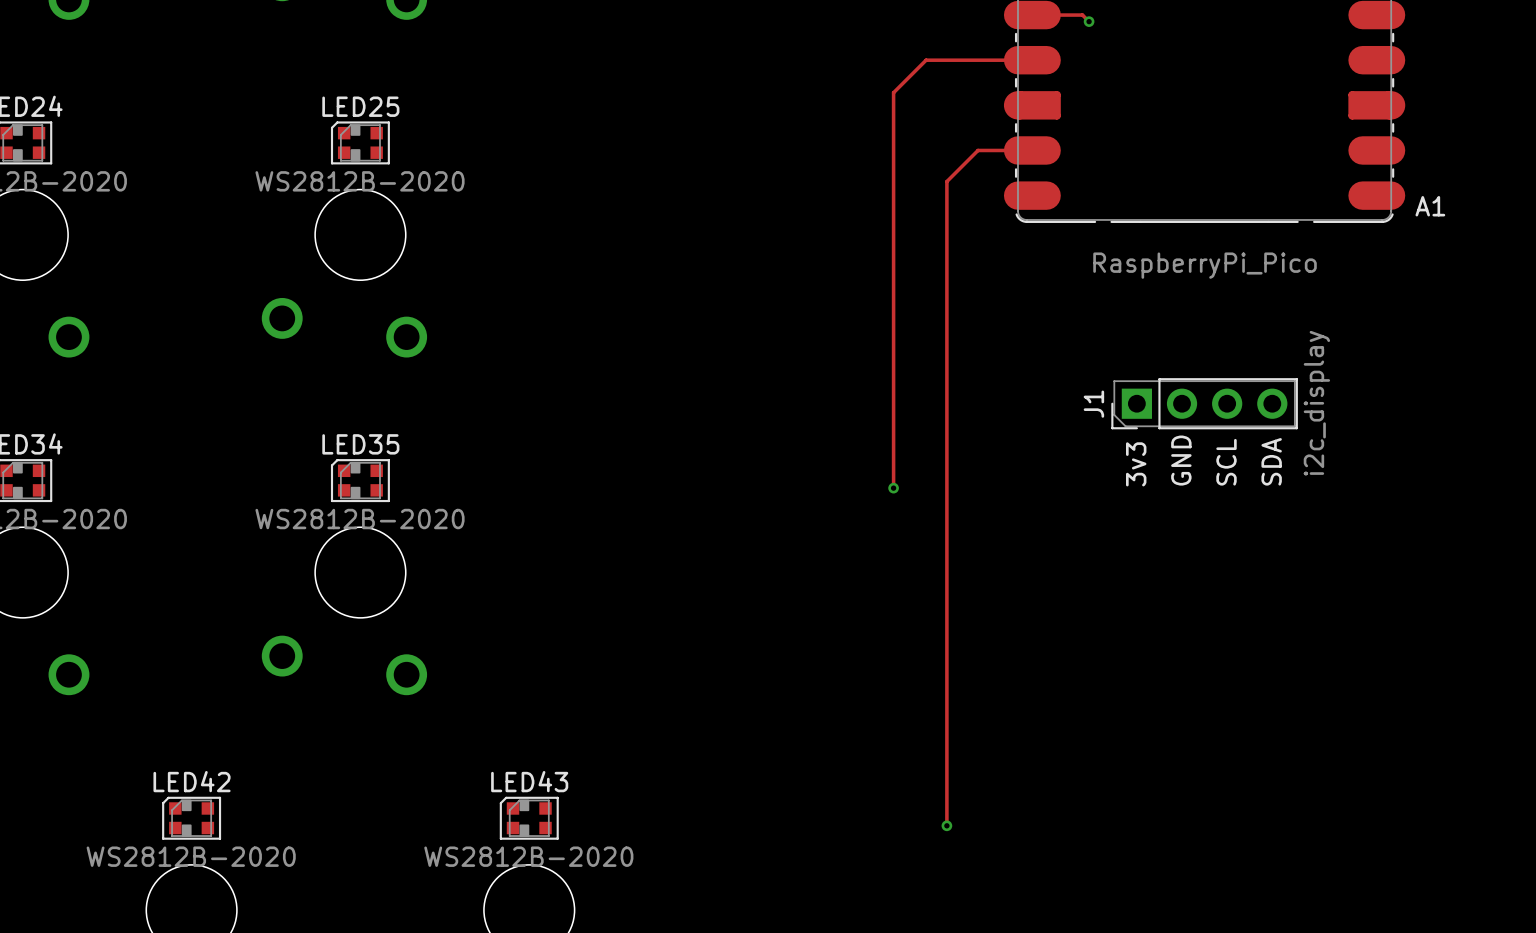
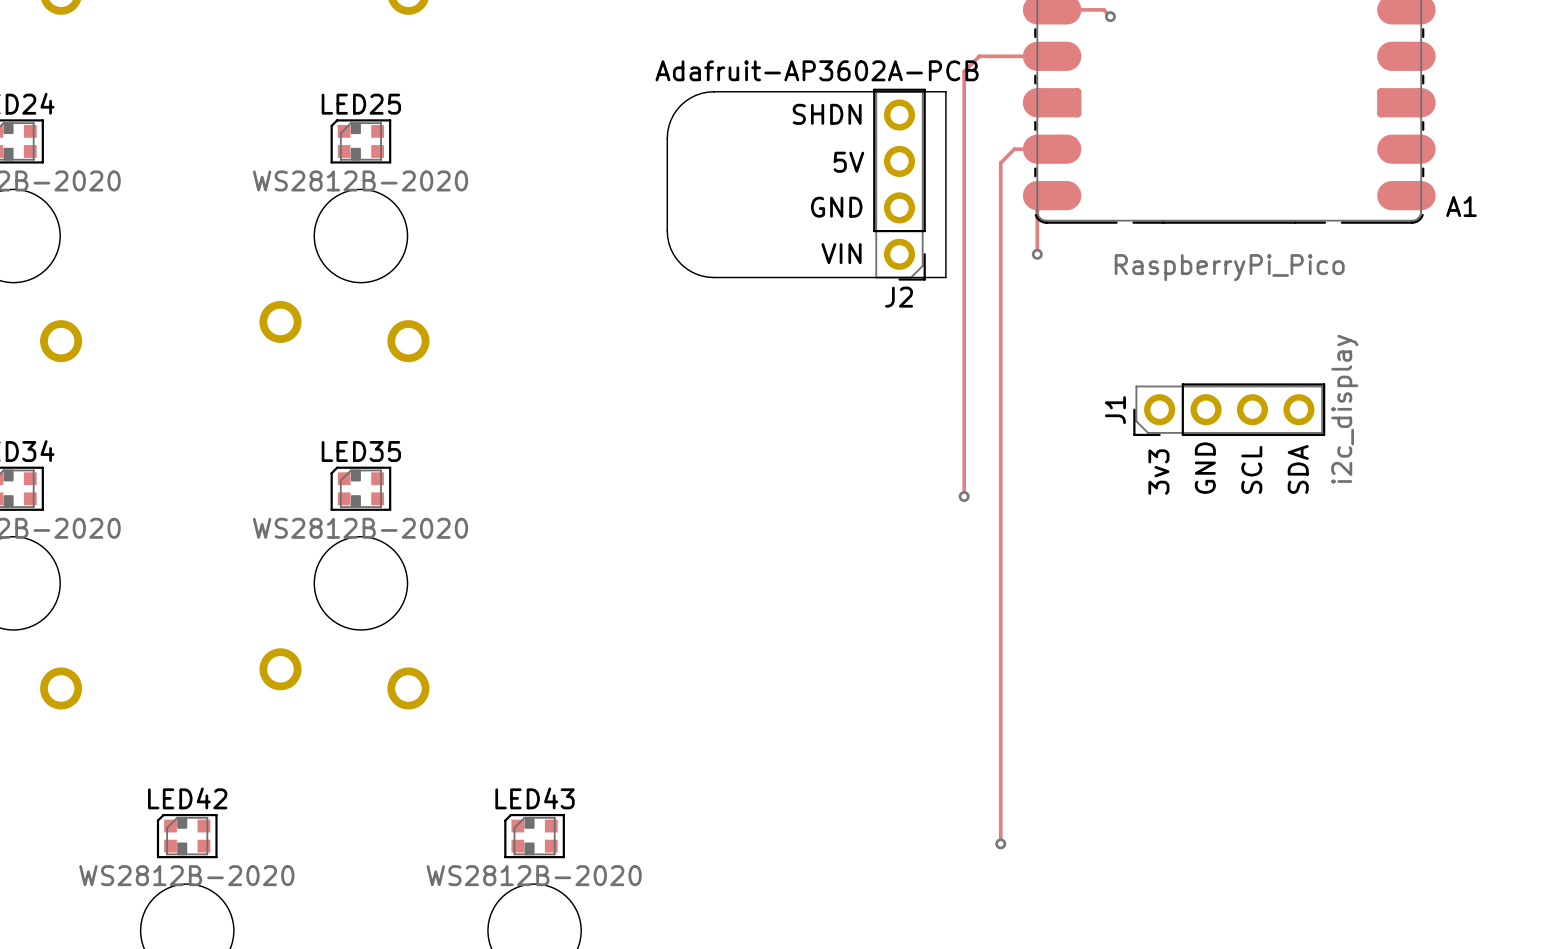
track: (961, 60) (926, 60) (893, 92) (893, 488) -> none
line: none -> (713, 91) (945, 91) (945, 277) (713, 277) (695, 273) (685, 267) (673, 254) (667, 237) (667, 132) (673, 115) (685, 101) (701, 93) (713, 91)
text: none -> SHDN (827, 114)
track: (995, 150) (978, 150) (946, 181) -> (979, 56) (964, 71) (964, 181)
track: none -> (1014, 149) (1000, 162) (1000, 843)
text: none -> 5V (848, 162)
J2: none -> Adafruit-AP3602A-PCB (899, 184)
track: none -> (1052, 195) (1037, 210) (1037, 254)
text: none -> GND (836, 207)
text: none -> VIN (841, 253)
via: none -> (1037, 254)
J1 footprint: [1111, 378, 1298, 430] -> [1133, 383, 1326, 437]
via position: (893, 488) -> (964, 496)
track: (946, 488) (946, 825) -> none
via position: (946, 825) -> (1000, 843)

